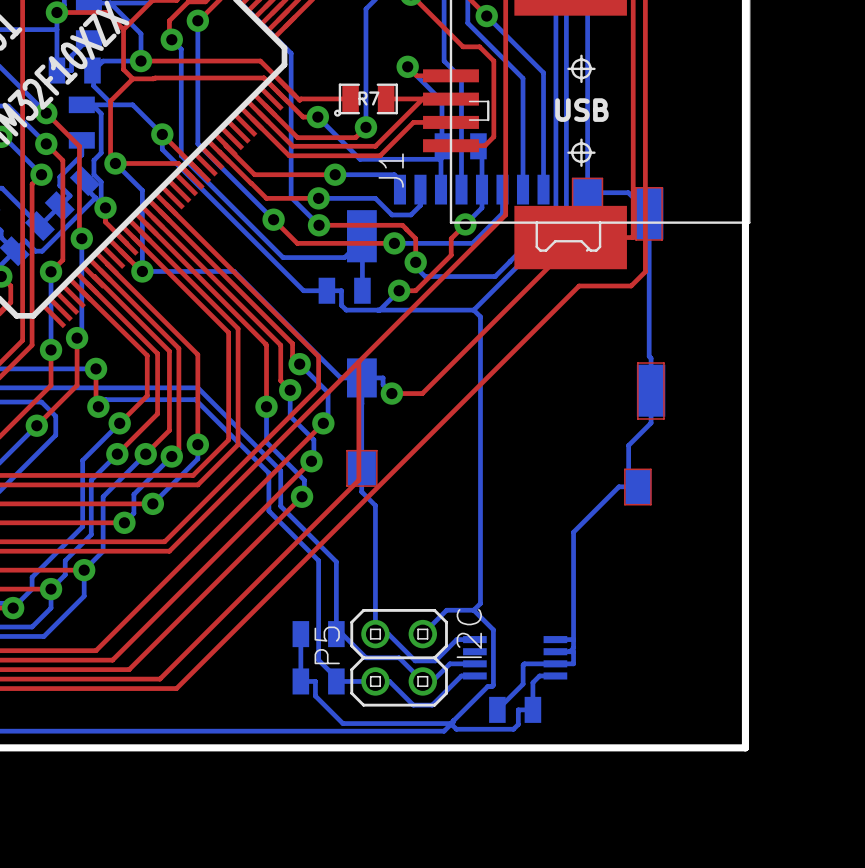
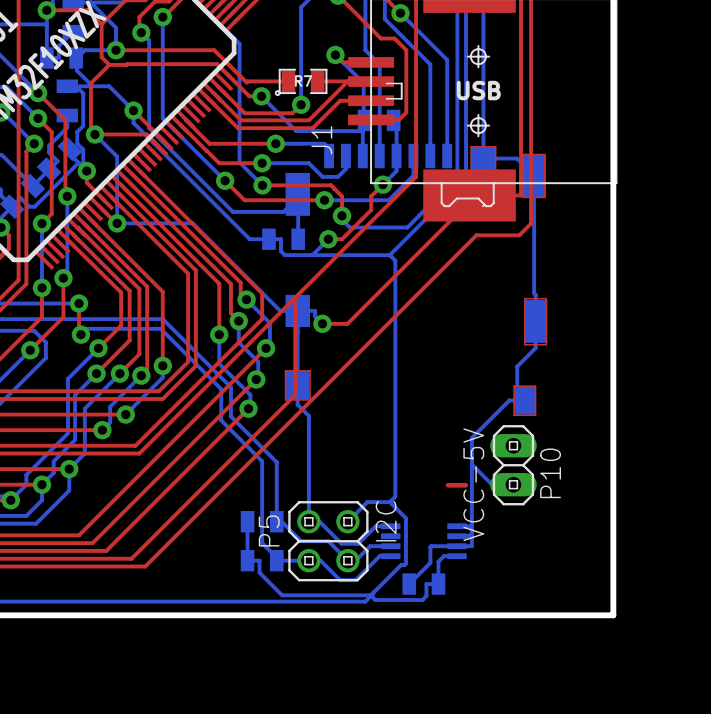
bottom track: none -> (471, 464) (492, 484) (513, 484)
P10: none -> VCC-5V (513, 465)
text: none -> - (456, 485)

